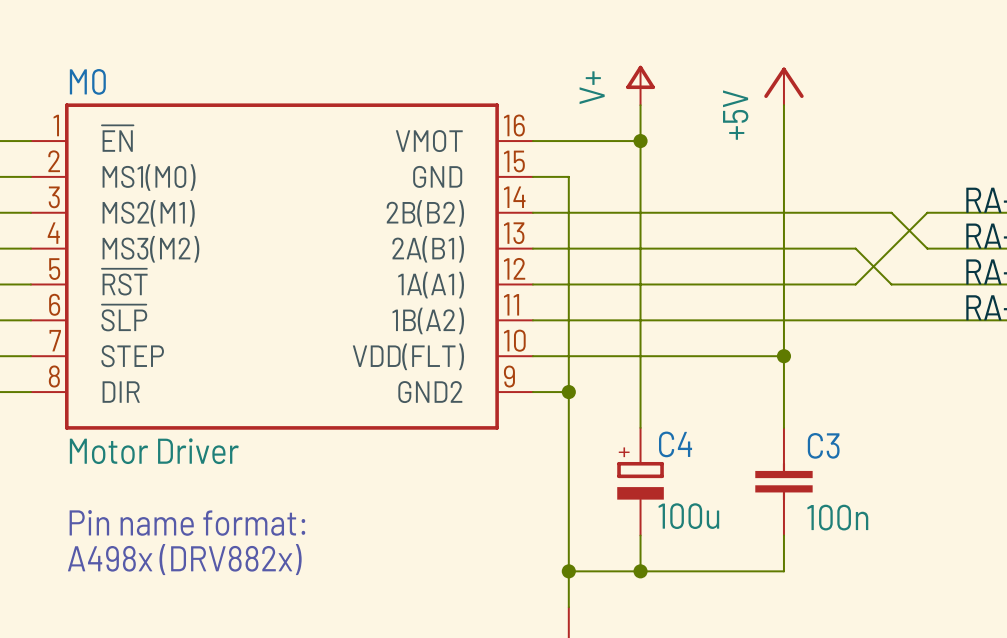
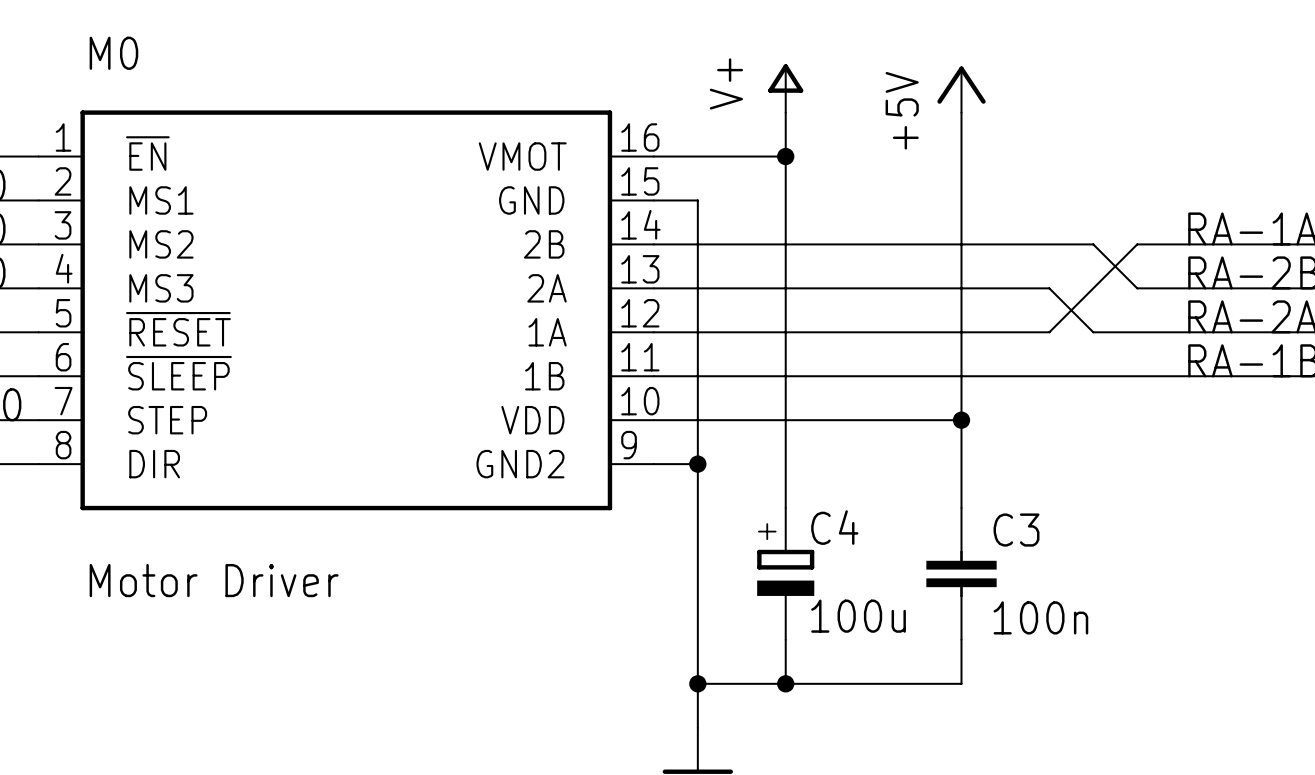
M0 symbol: [30, 103, 533, 430] -> [38, 110, 654, 511]
M0 value position: Motor Driver (154, 451) -> Motor Driver (214, 580)

